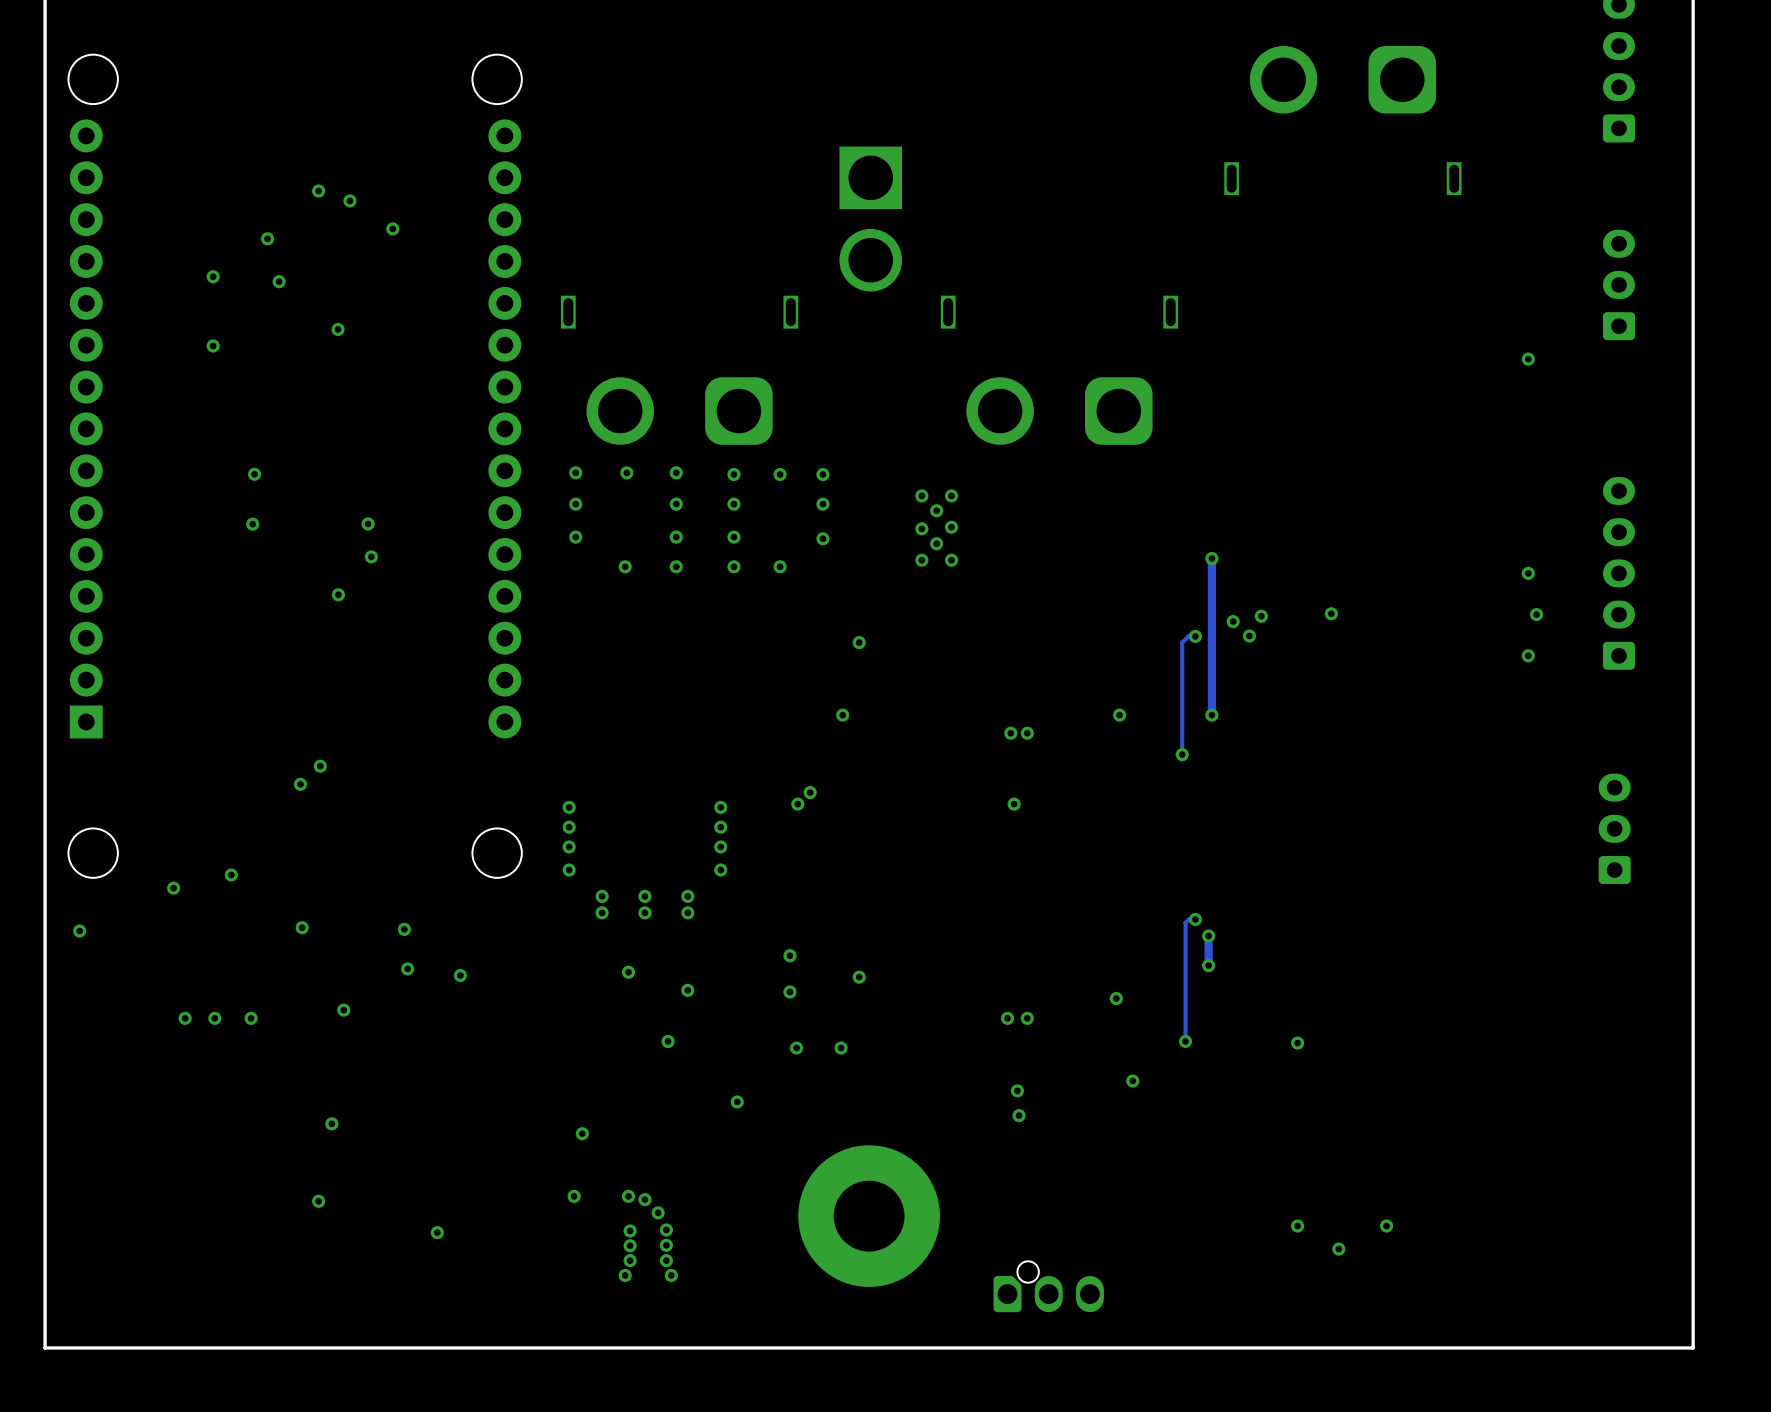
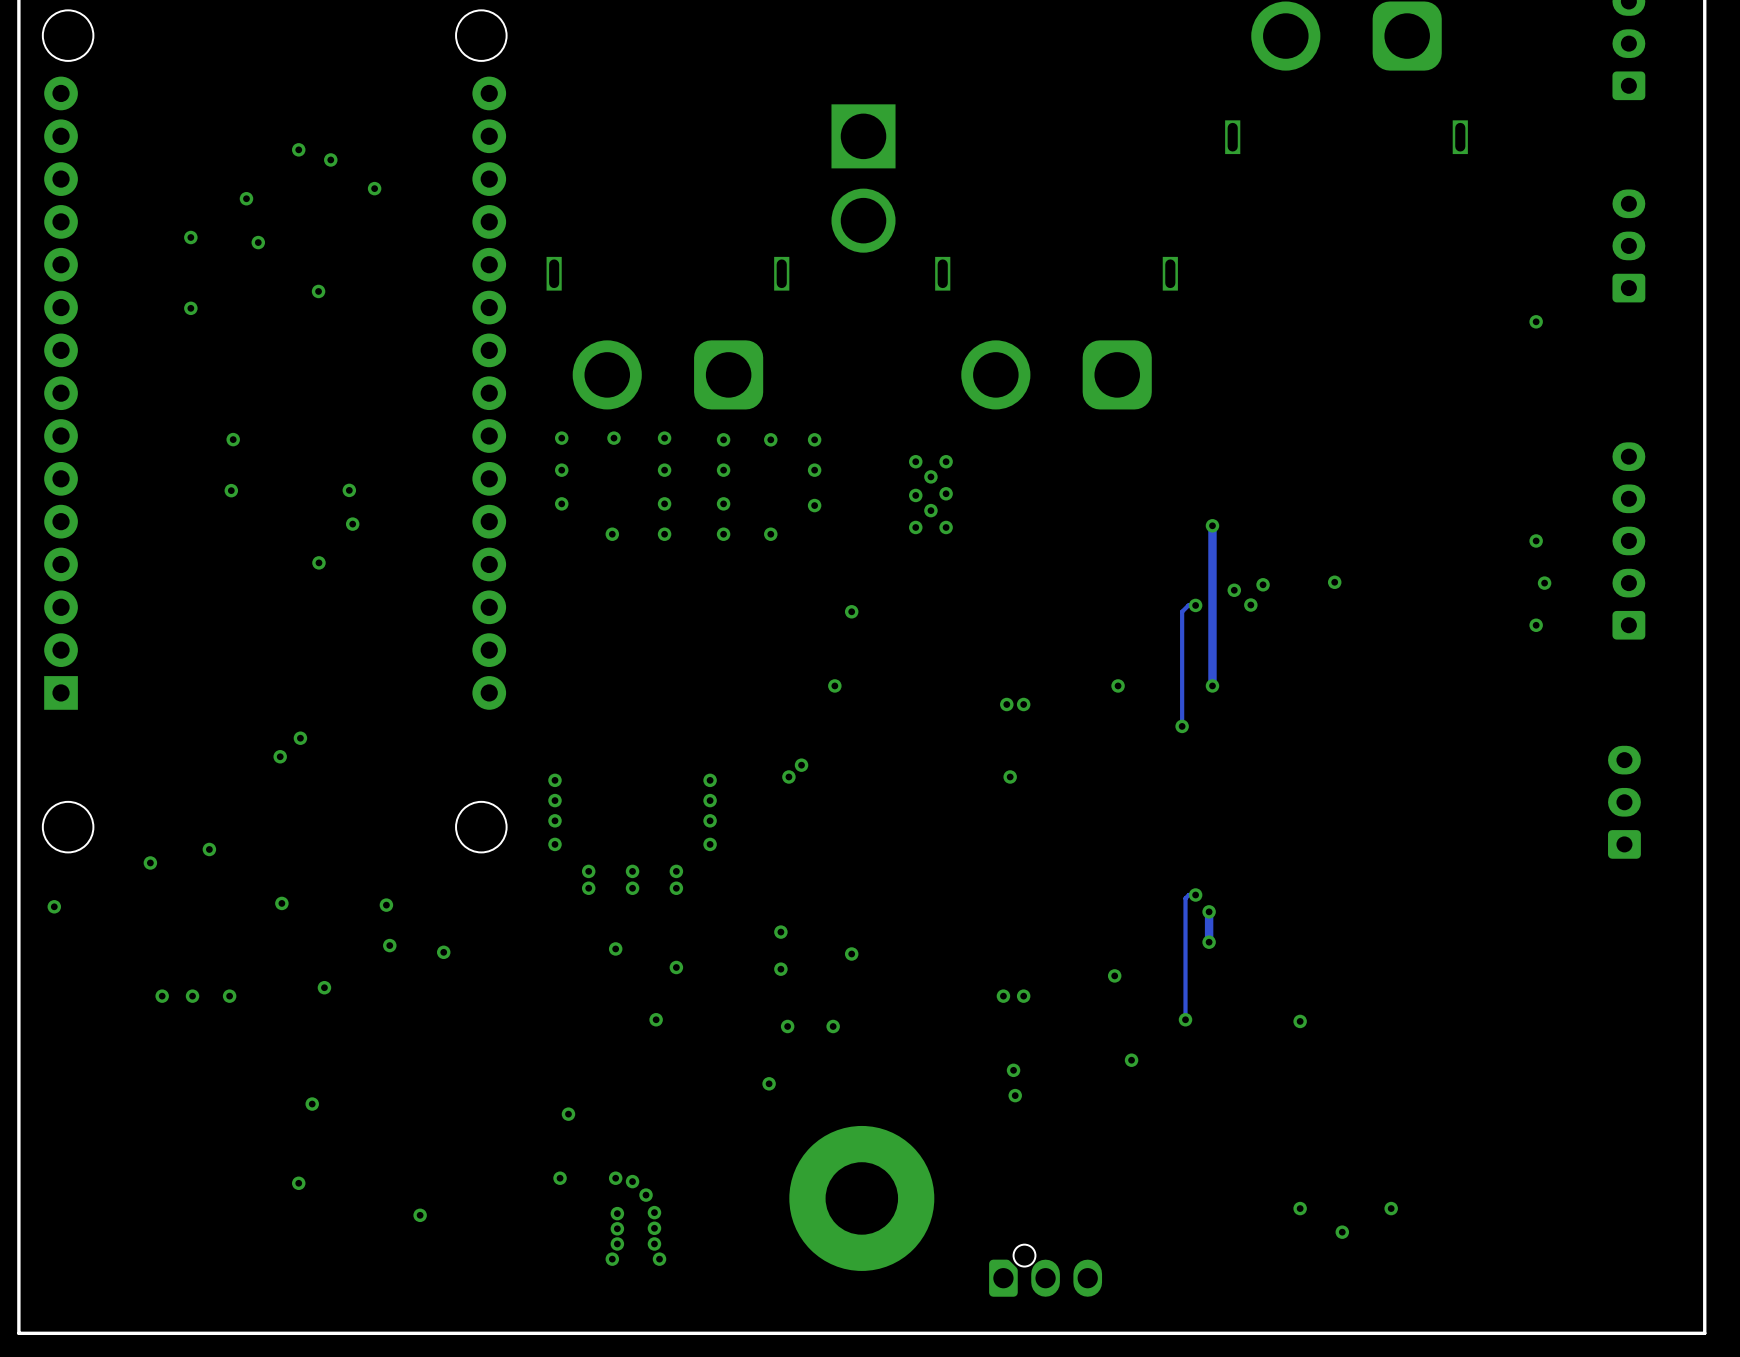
via position: (737, 1101) -> (769, 1083)

